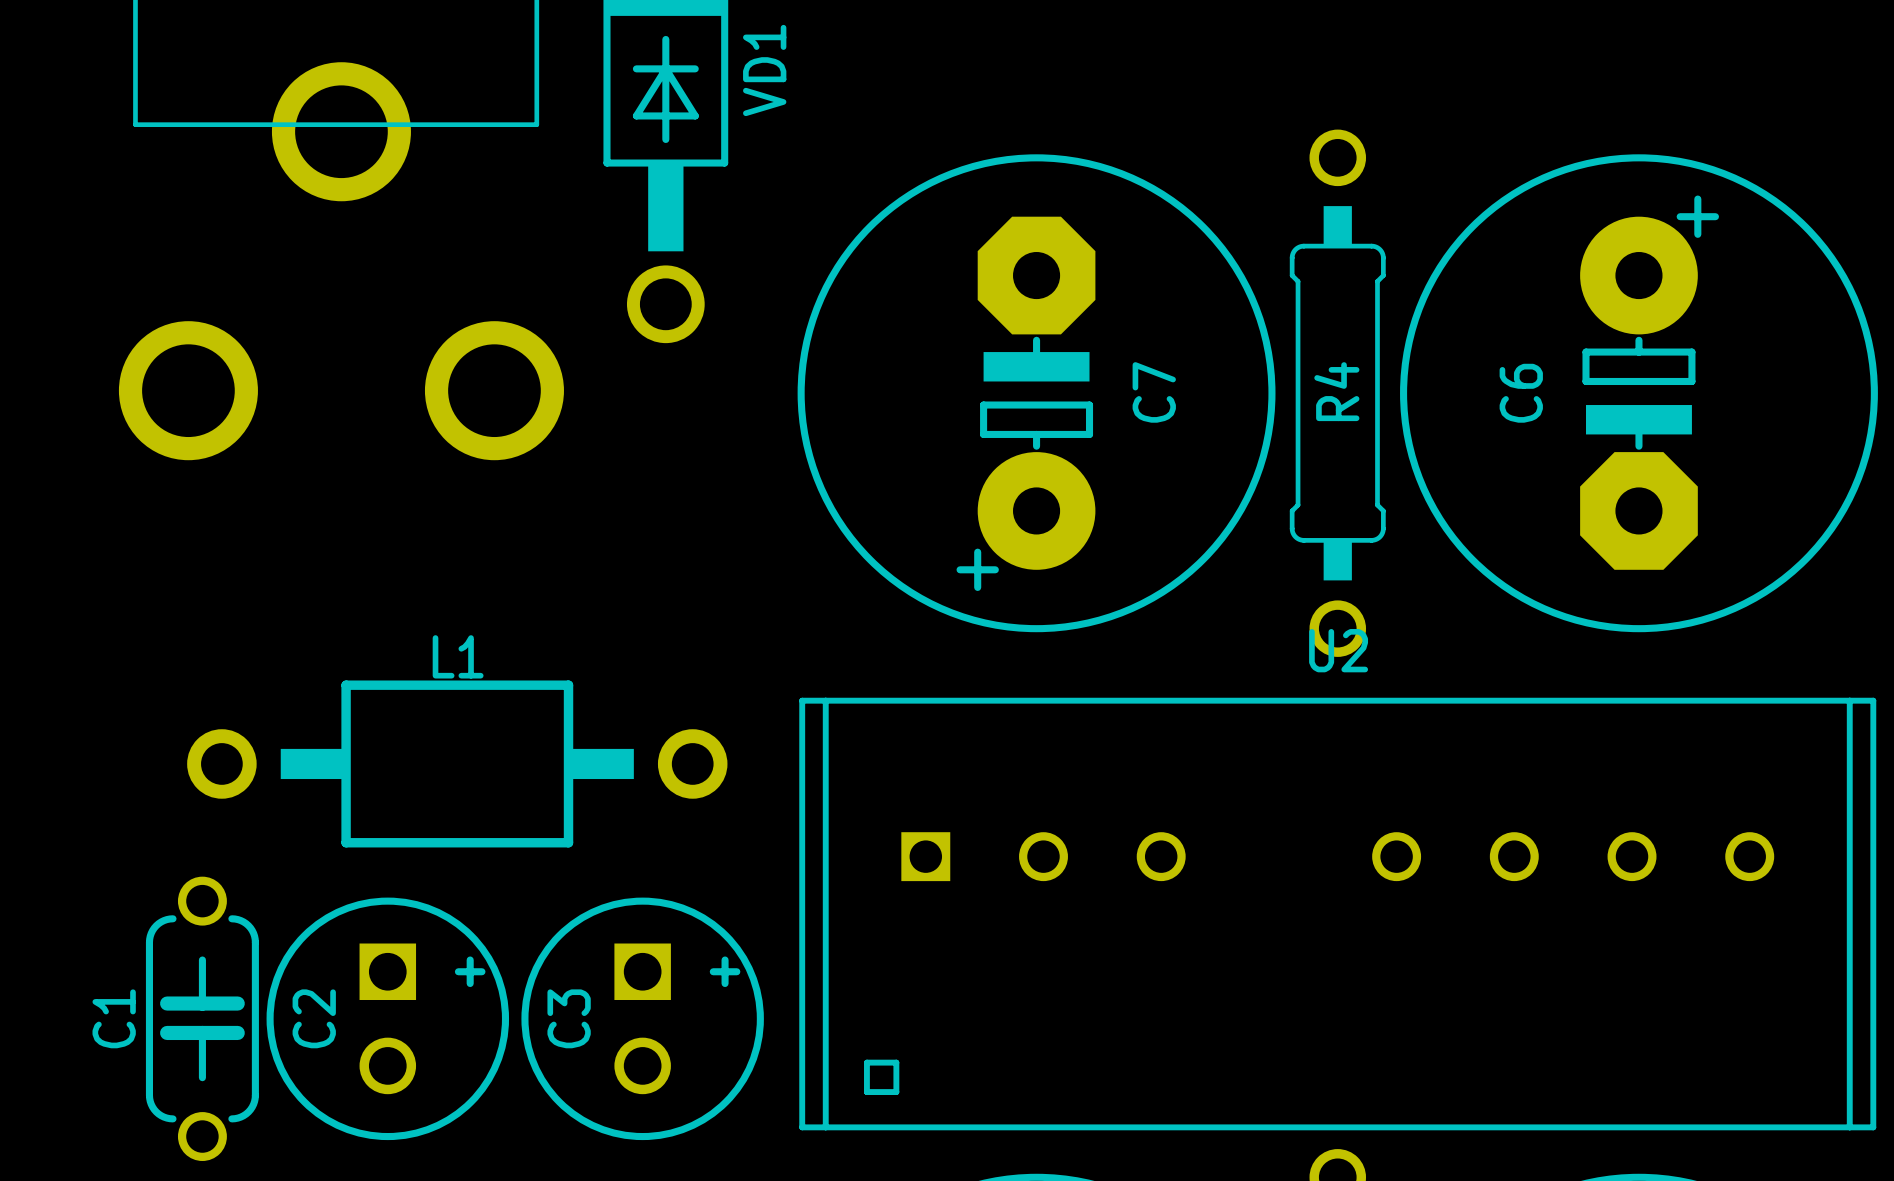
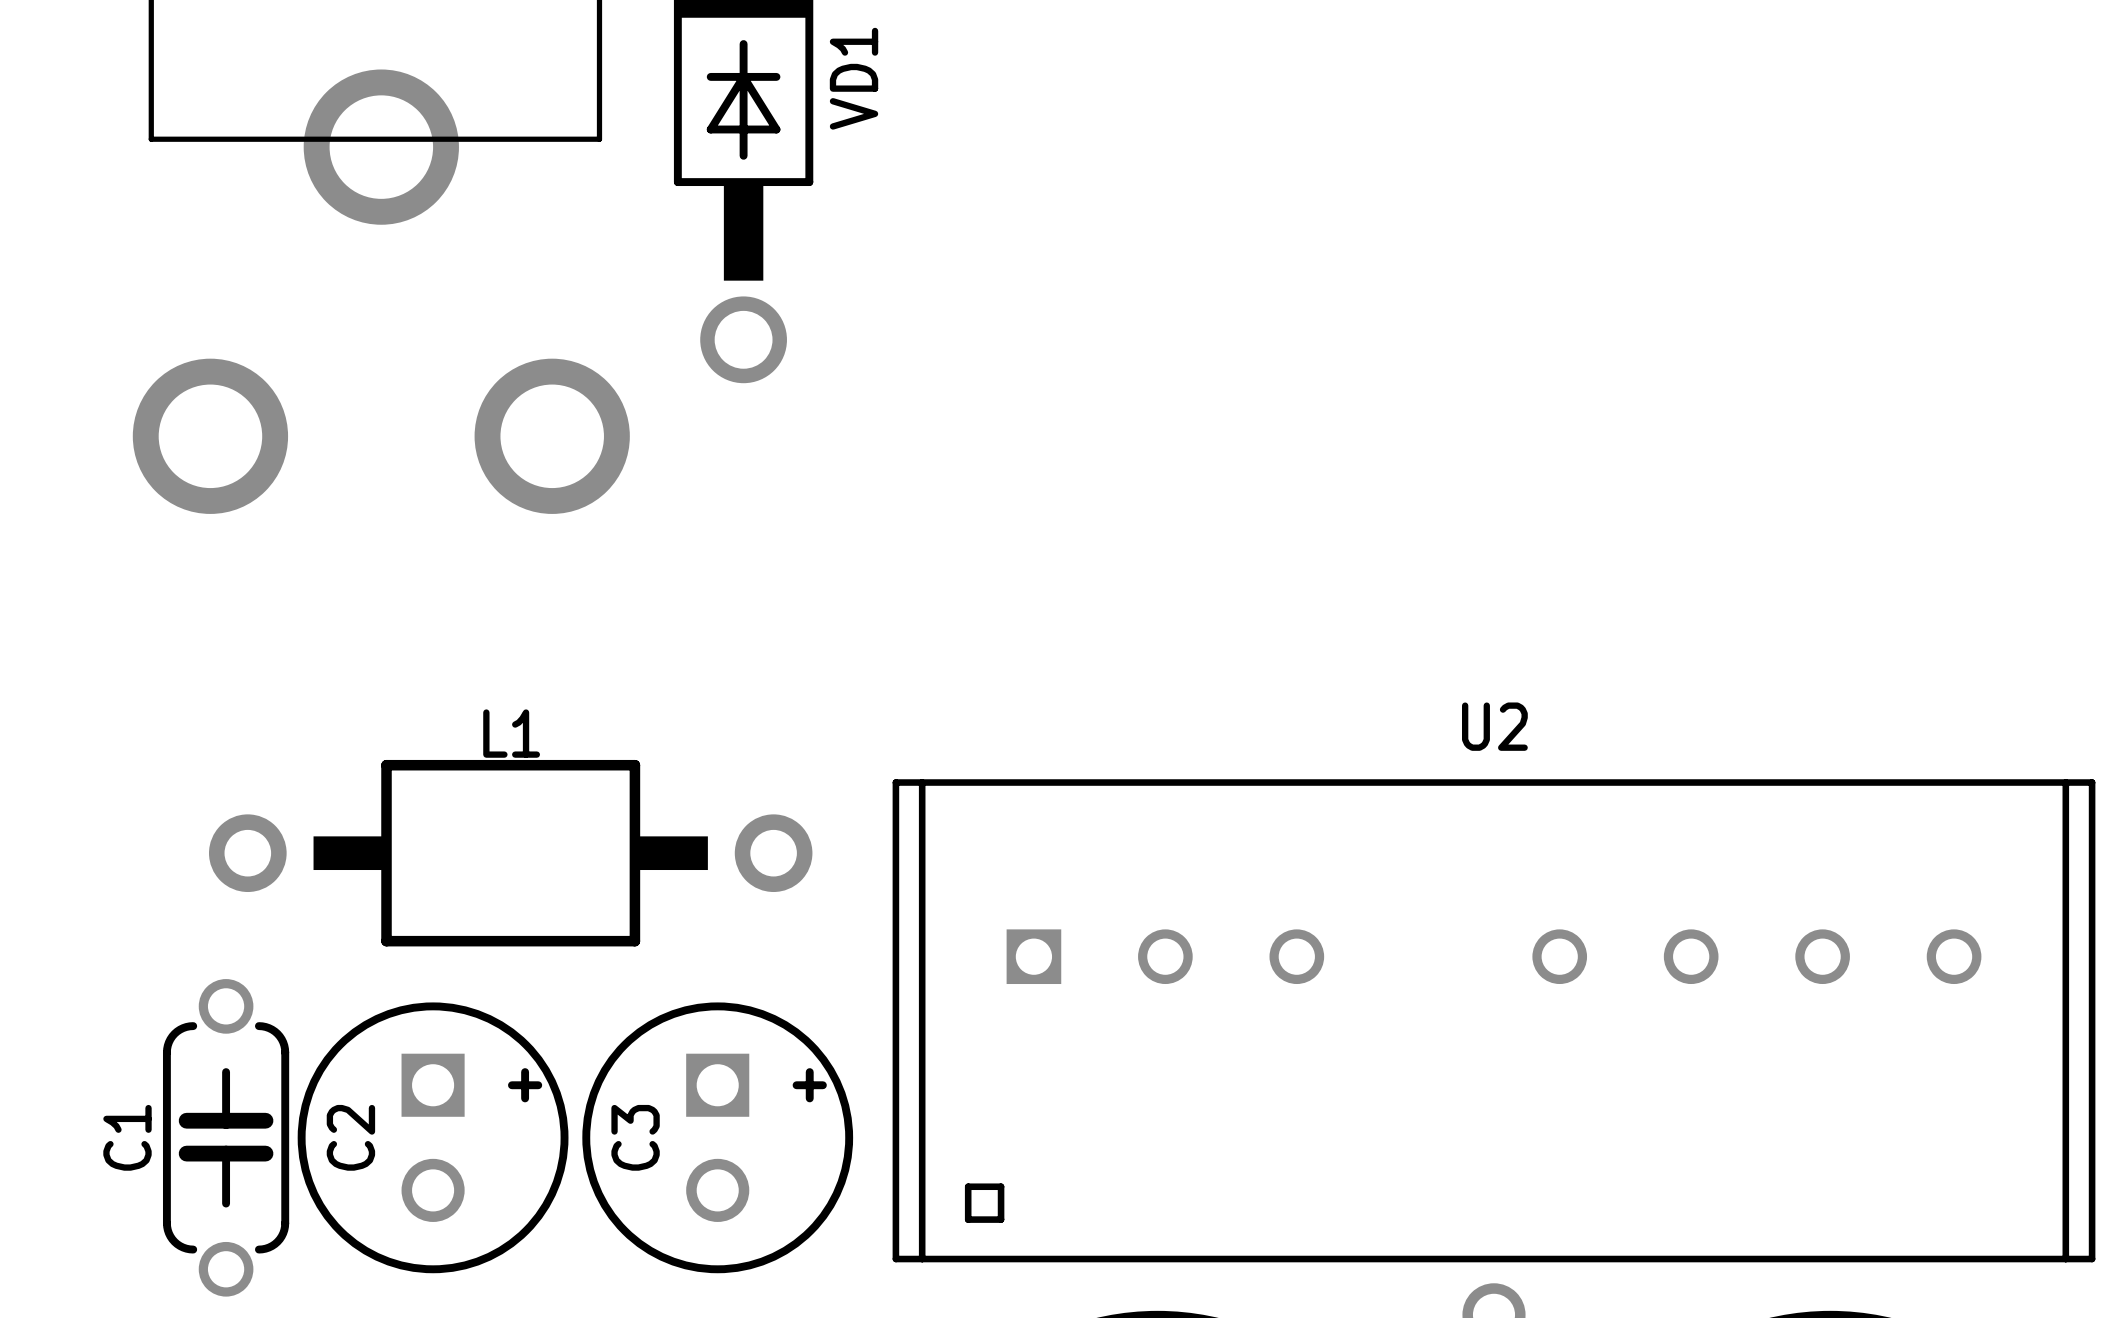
C7: (1036, 393) -> none
R4: (1337, 393) -> none
C6: (1638, 393) -> none

